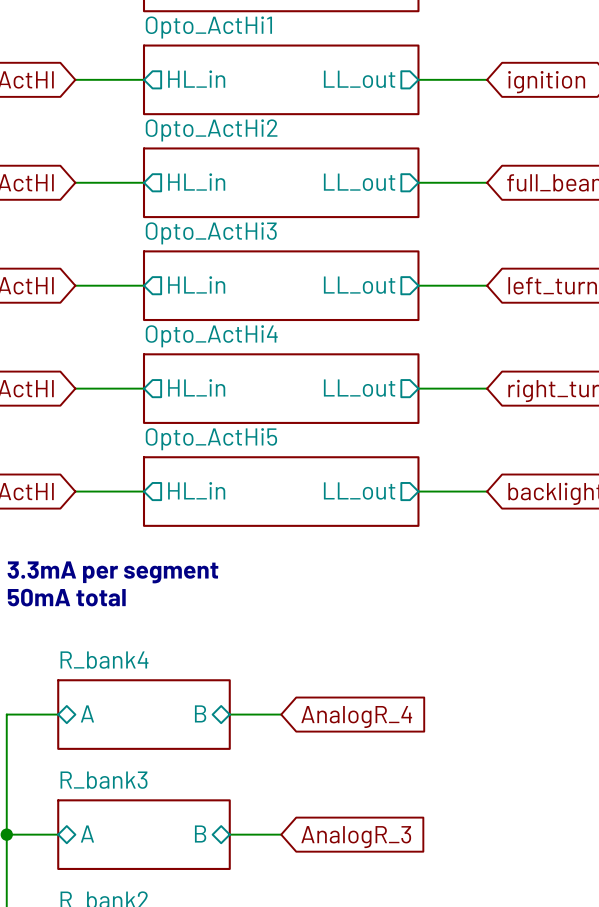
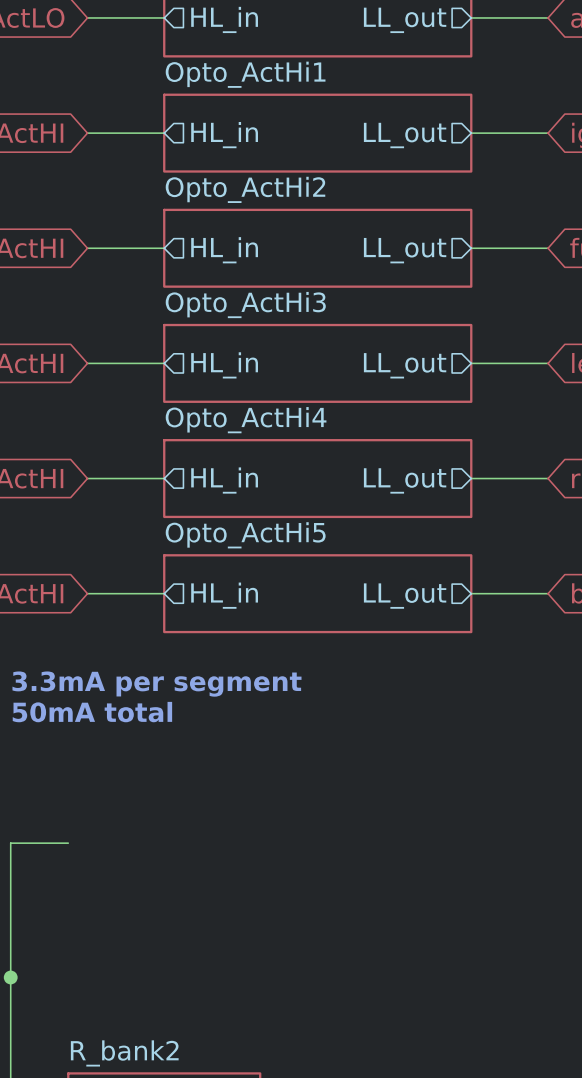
sheet pin: A (87, 713) -> none
sheet pin: B (200, 713) -> none
sheet R_bank4: (144, 714) -> none
wire: (229, 714) (281, 714) -> none
global label: AnalogR_4 (356, 717) -> none
wire: (6, 834) (58, 834) -> none
sheet pin: A (87, 834) -> none
sheet R_bank3: (144, 834) -> none
sheet pin: B (200, 834) -> none
wire: (229, 834) (281, 834) -> none
global label: AnalogR_3 (356, 837) -> none

